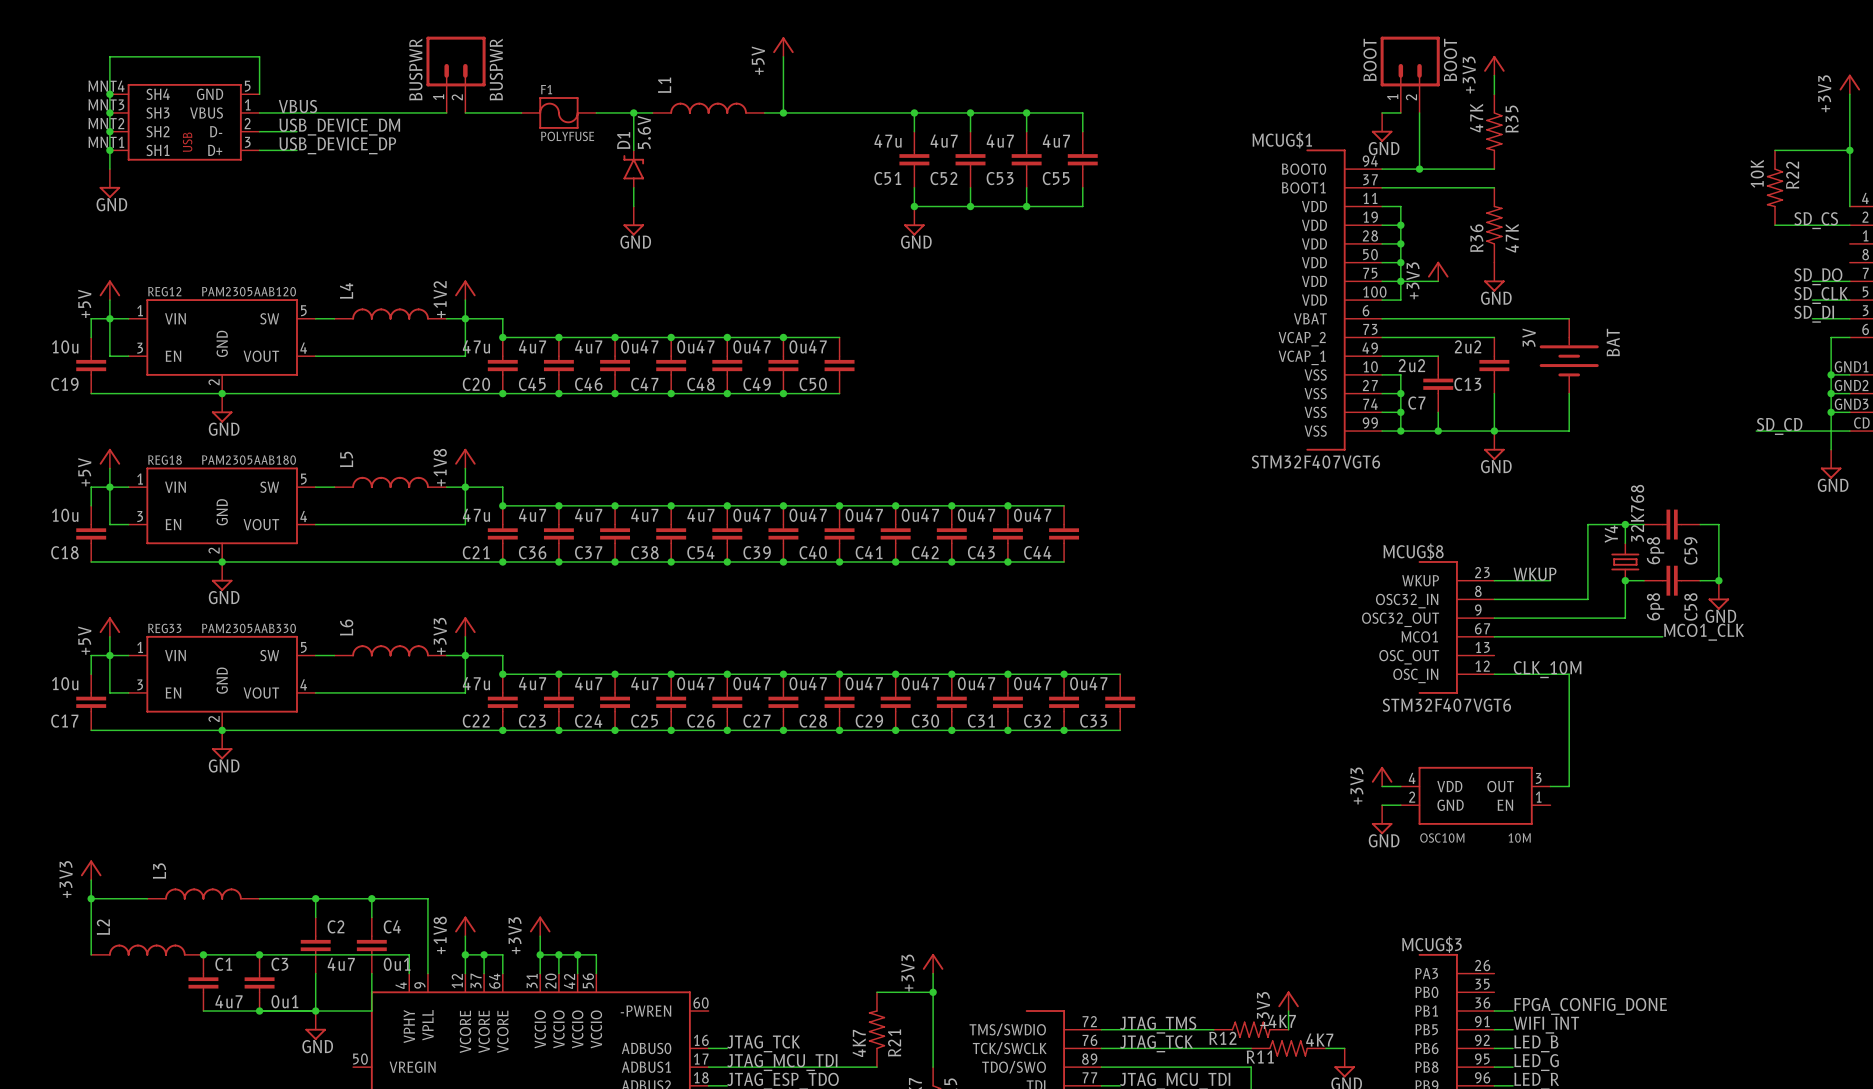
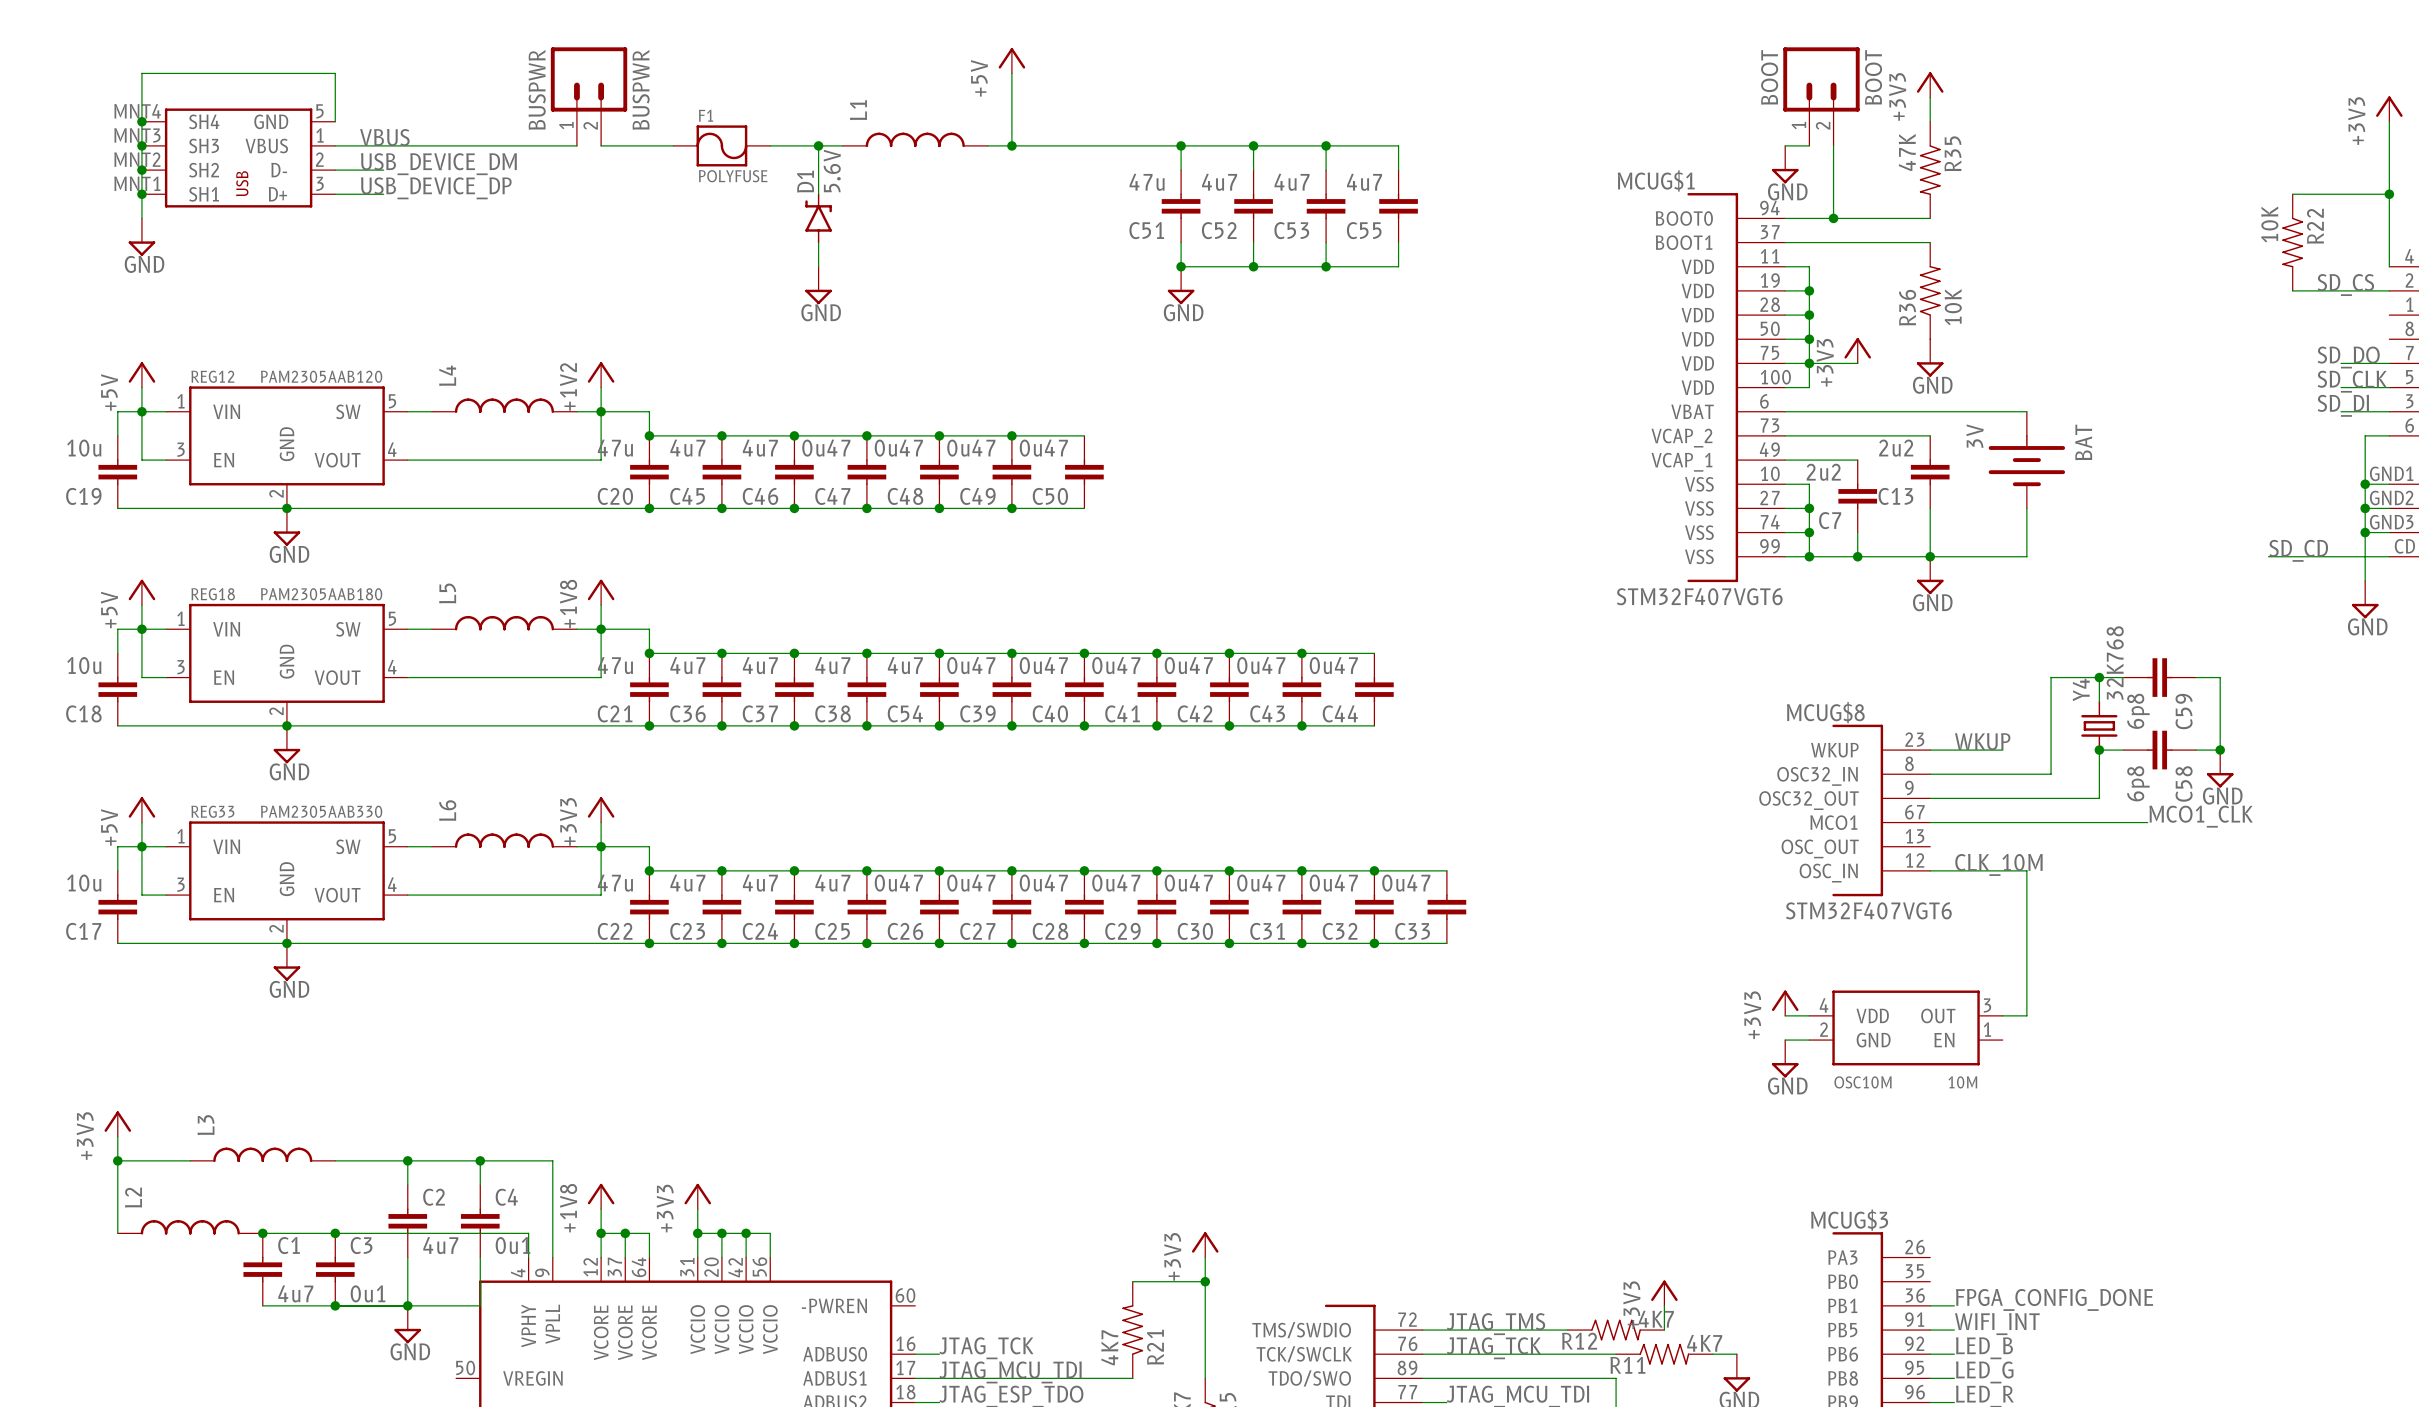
R36 value: 47K (1512, 238) -> 10K (1953, 307)

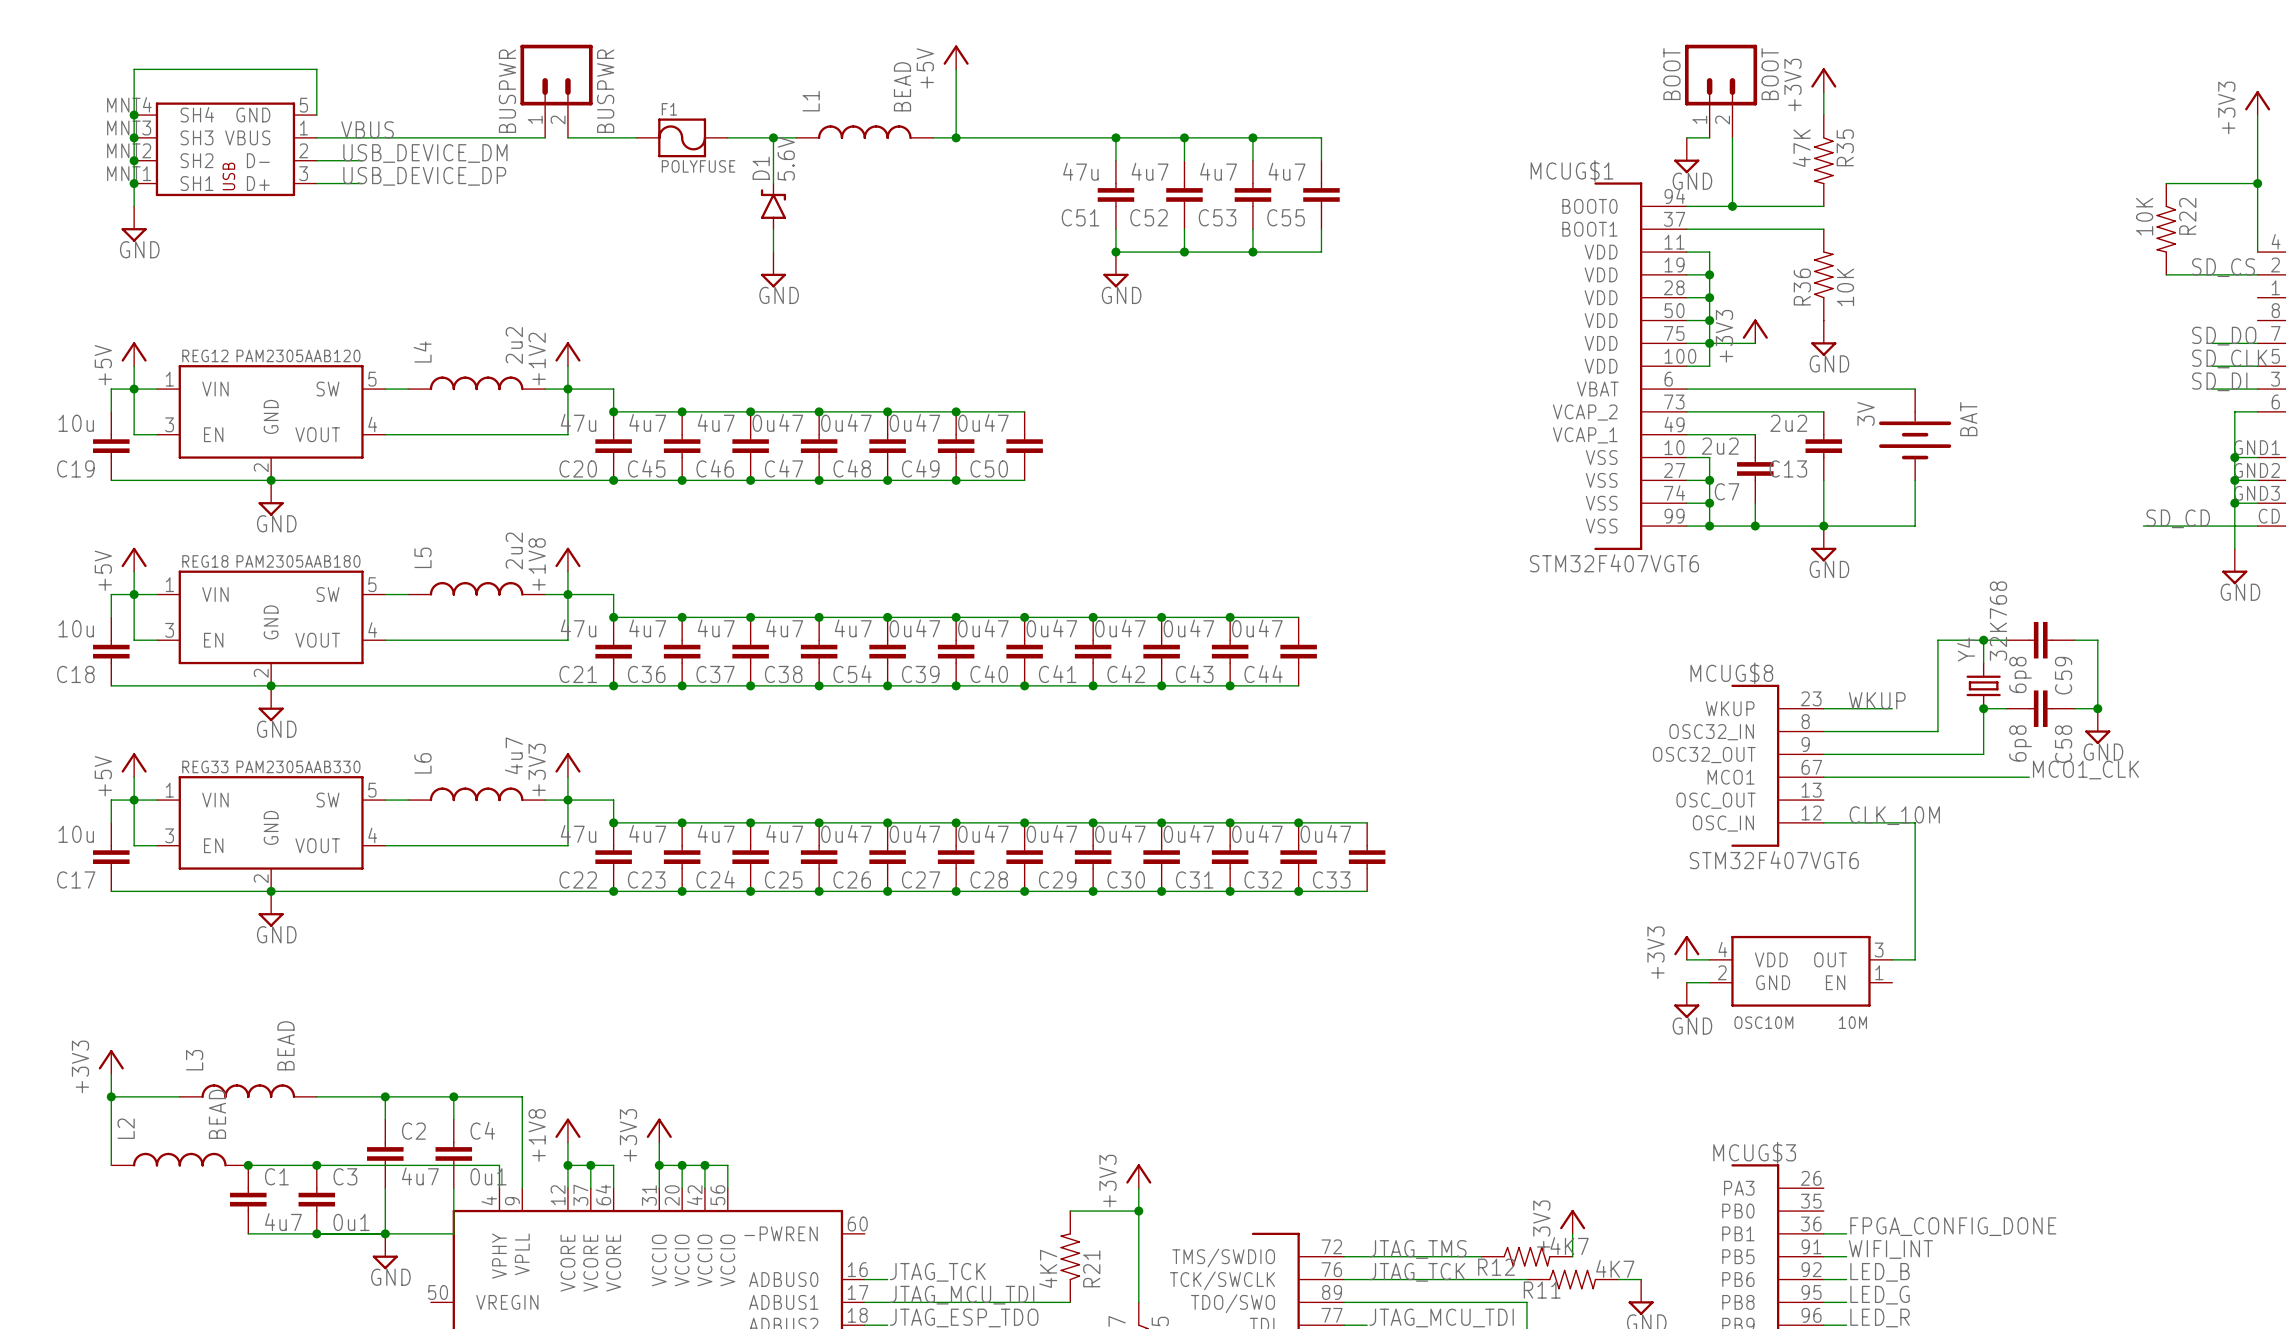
L1 value: none -> BEAD (902, 86)
L4 value: none -> 2u2 (514, 345)
L5 value: none -> 2u2 (514, 551)
L6 value: none -> 4u7 (513, 755)
L3 value: none -> BEAD (285, 1045)
L2 value: none -> BEAD (217, 1114)

